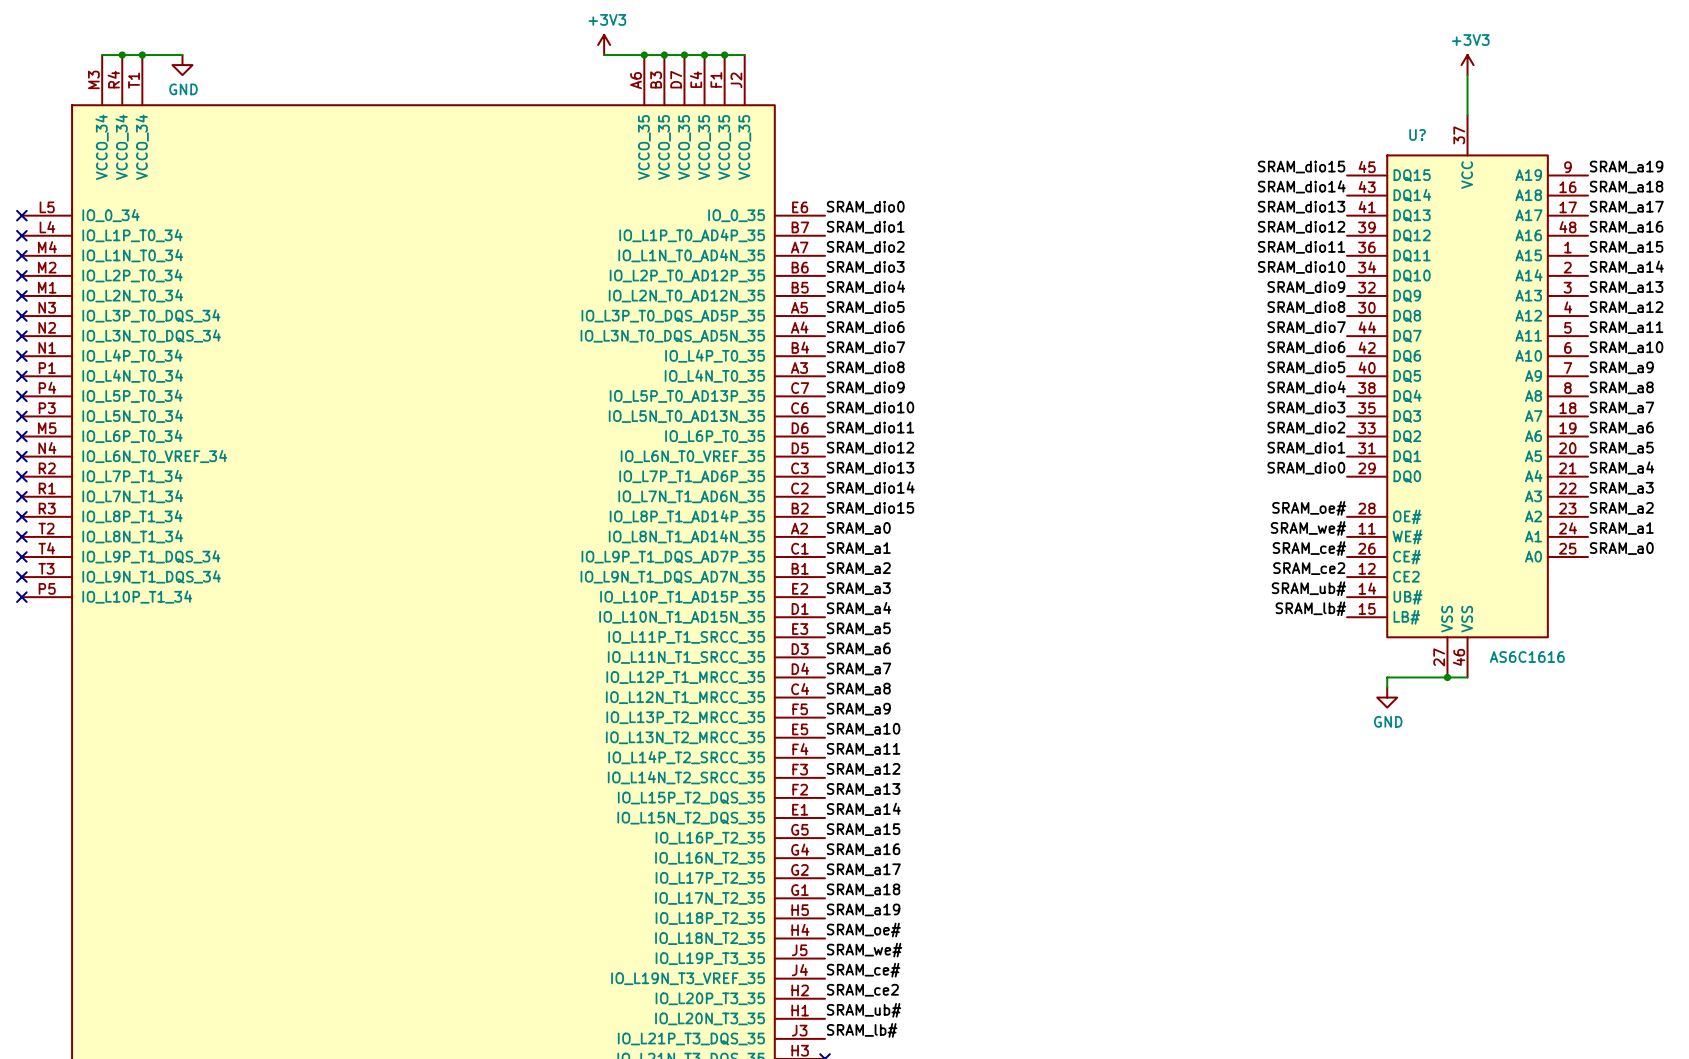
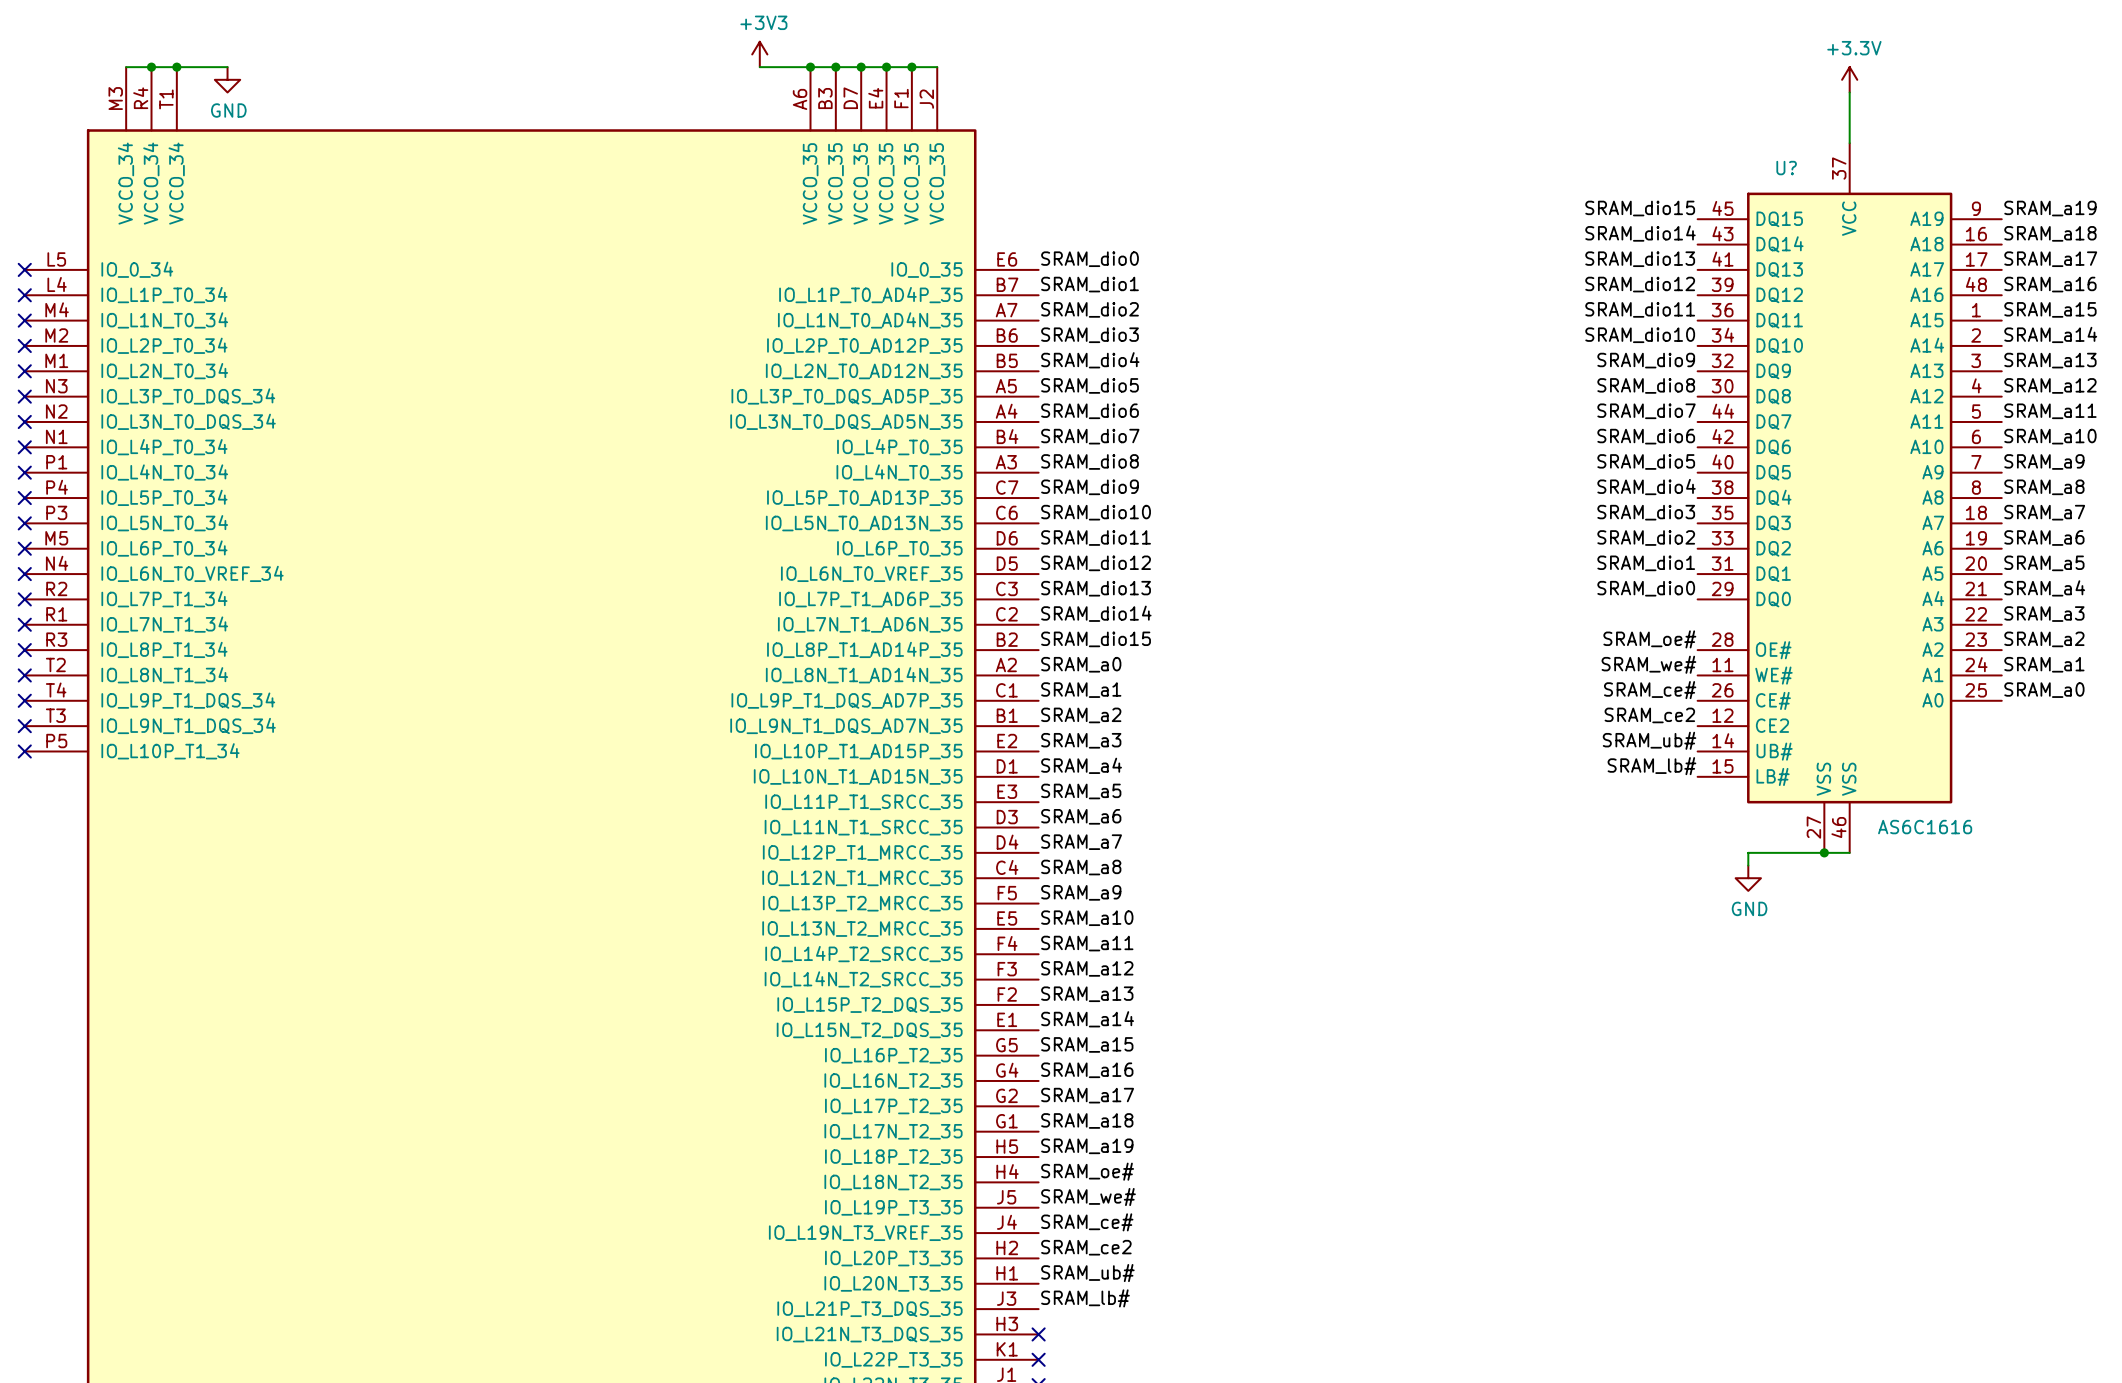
power symbol: +3V3 (1467, 65) -> +3.3V (1849, 79)

